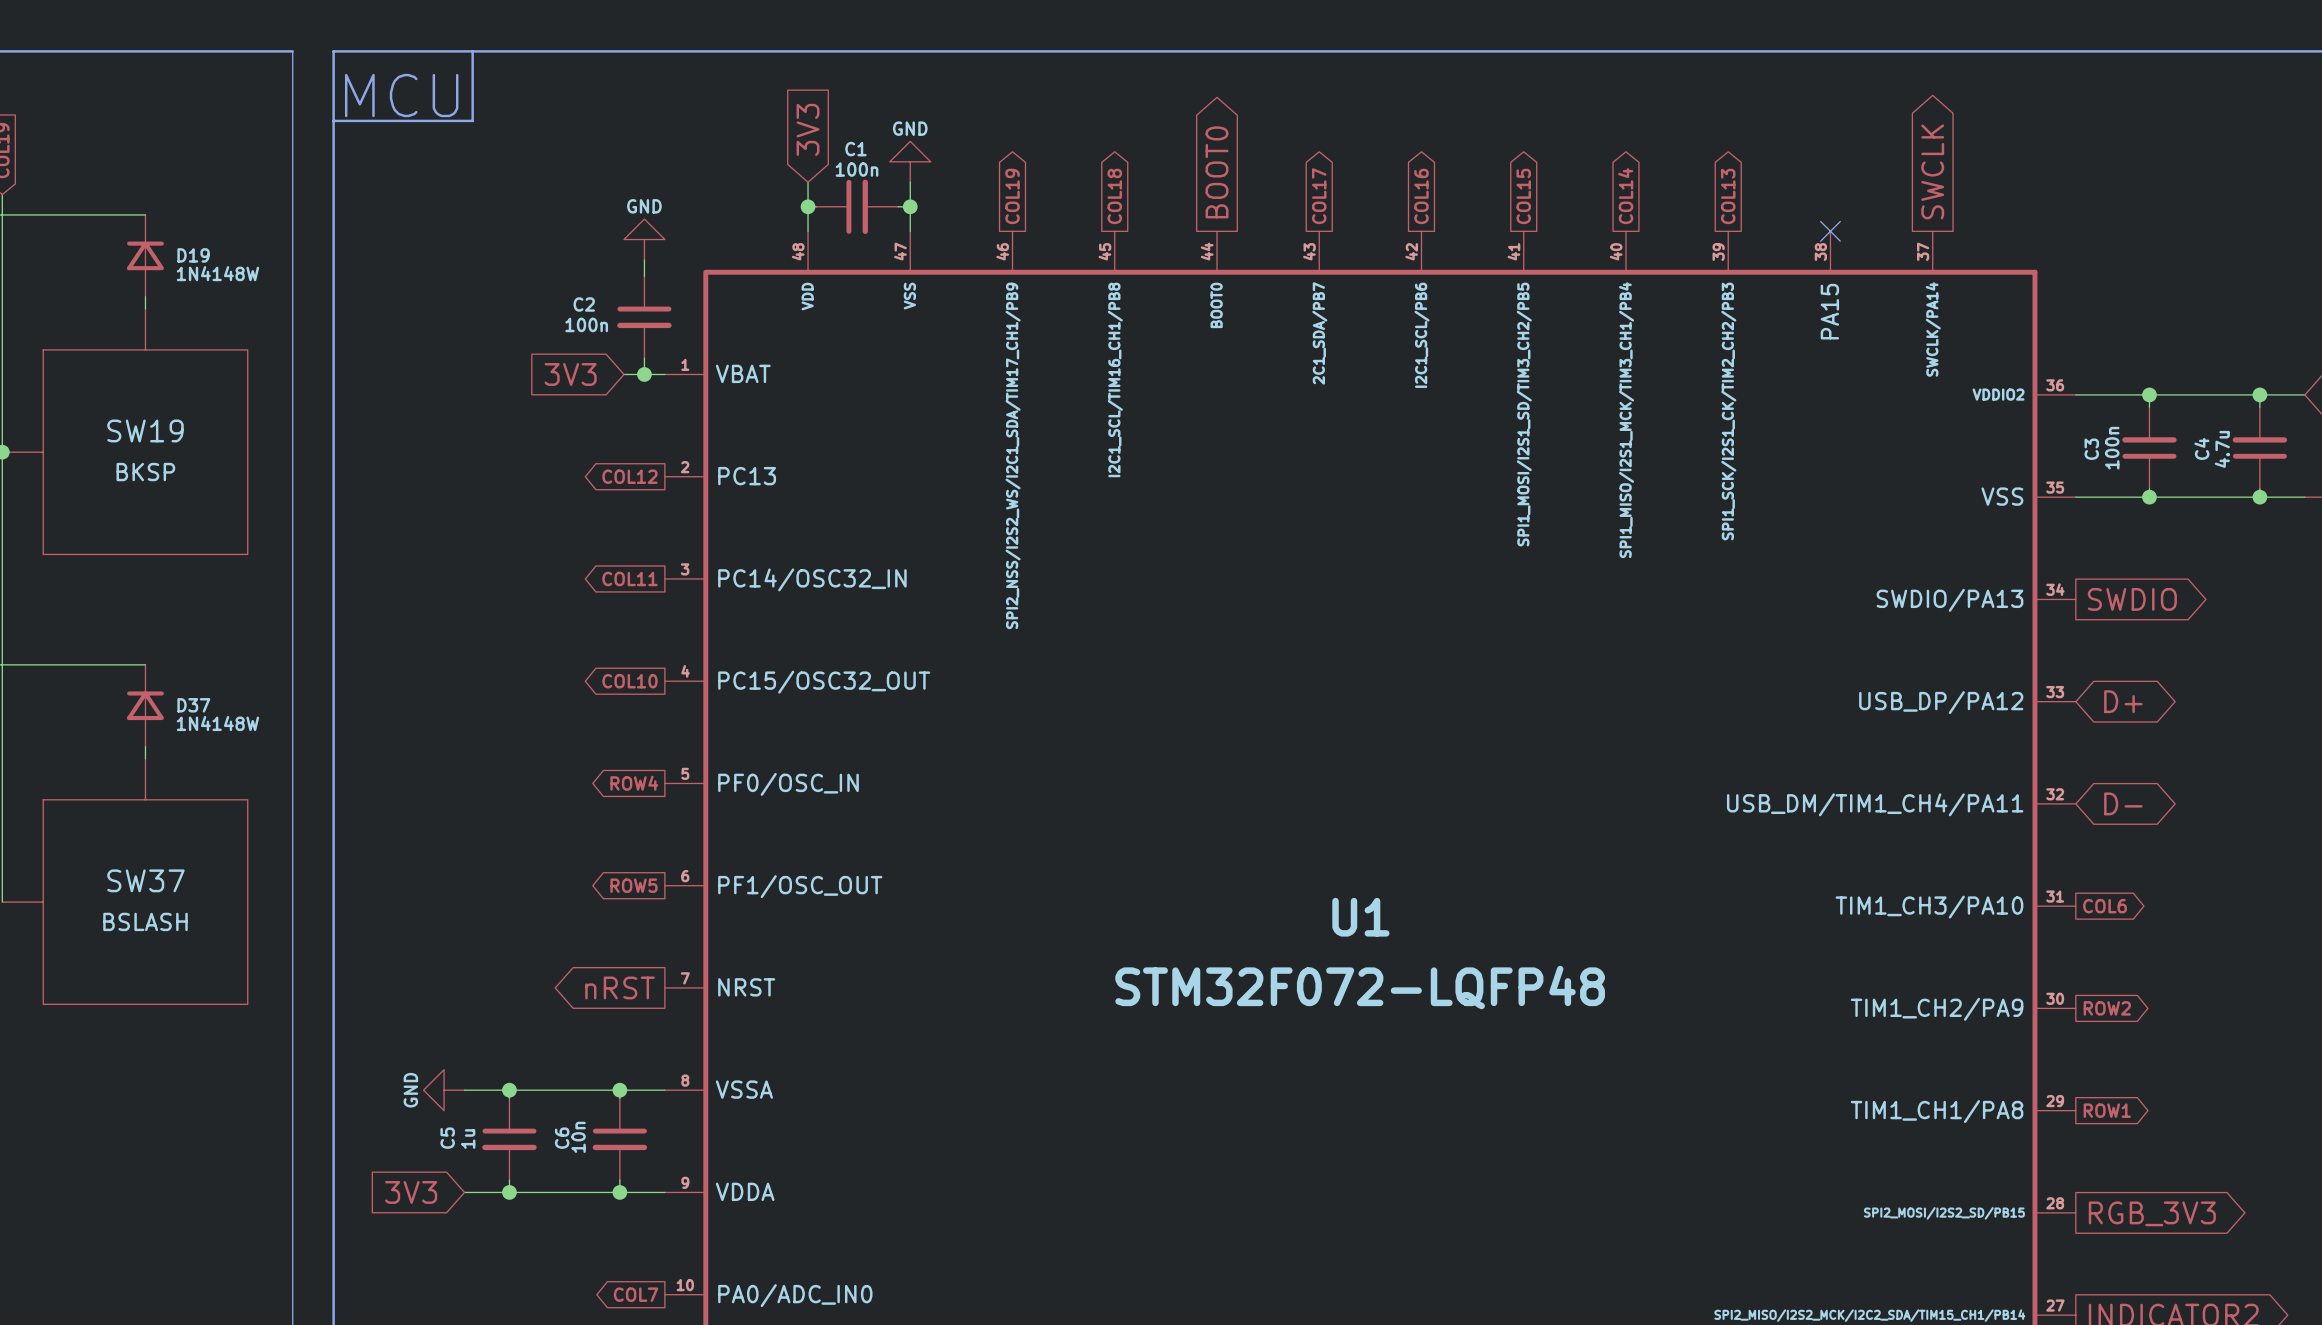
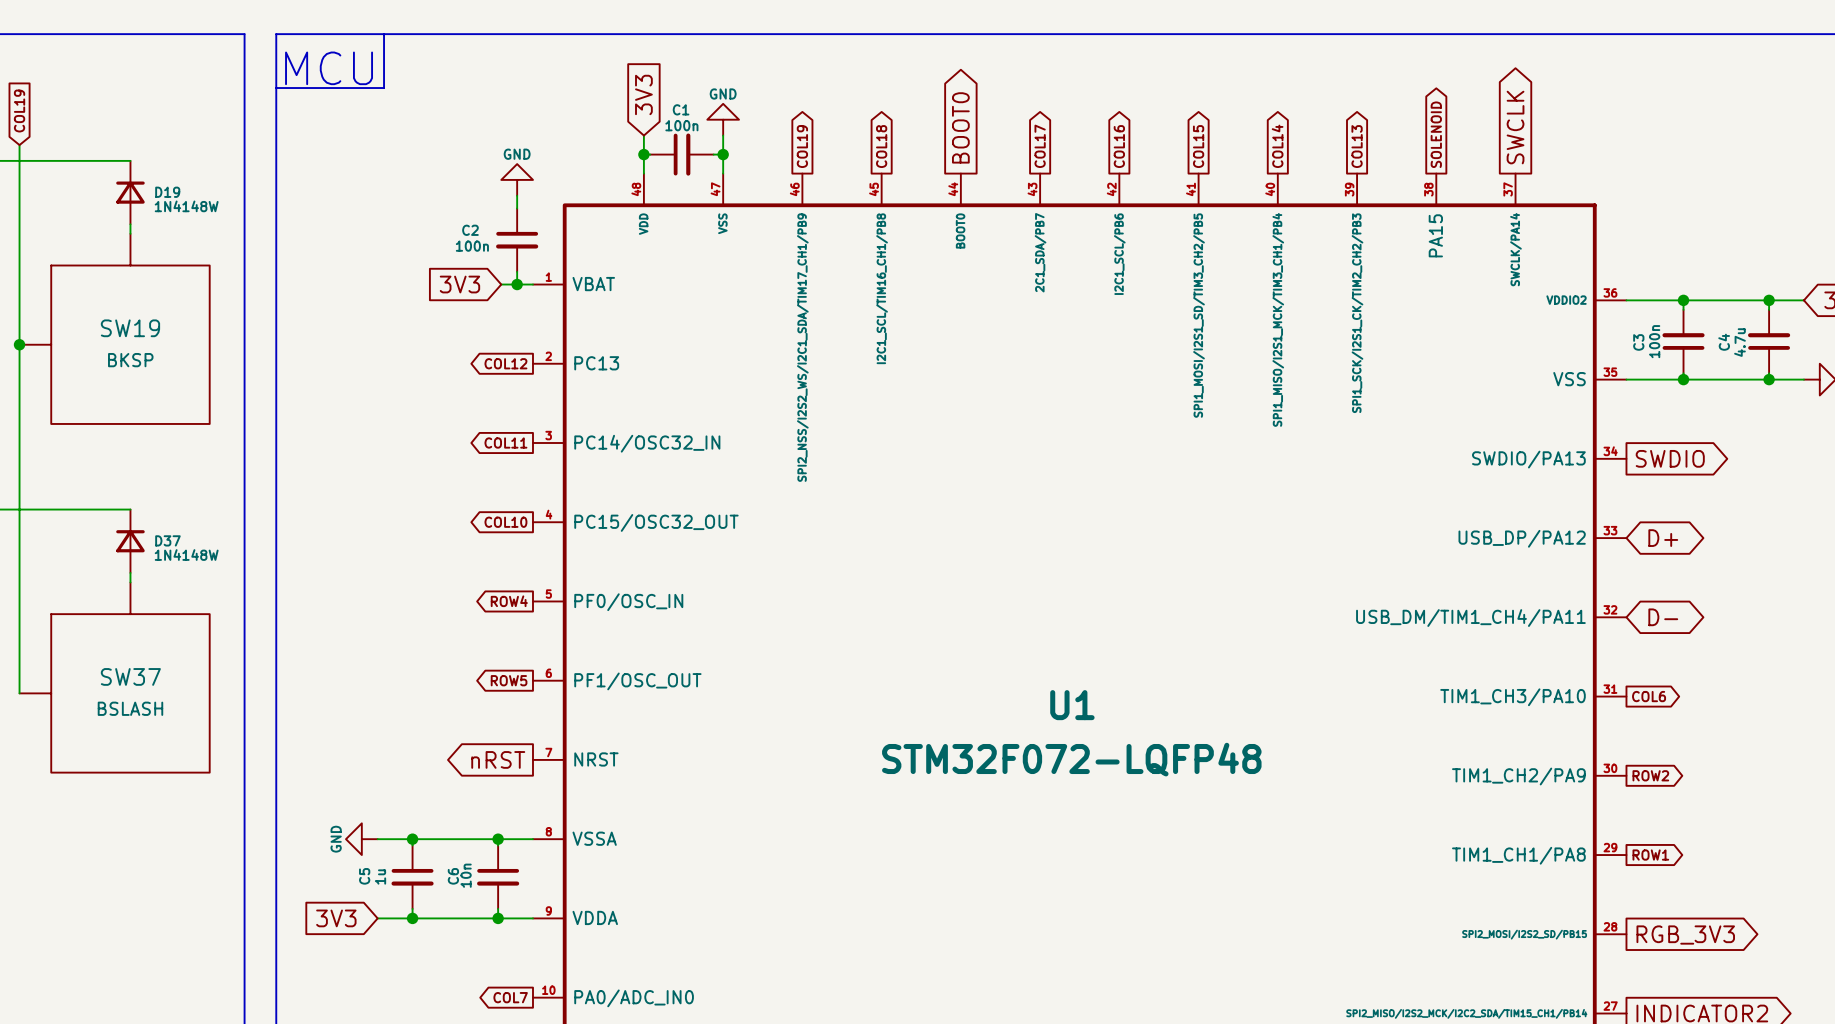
global label: none -> SOLENOID (1436, 134)
no-connect mark: (1830, 231) -> none

